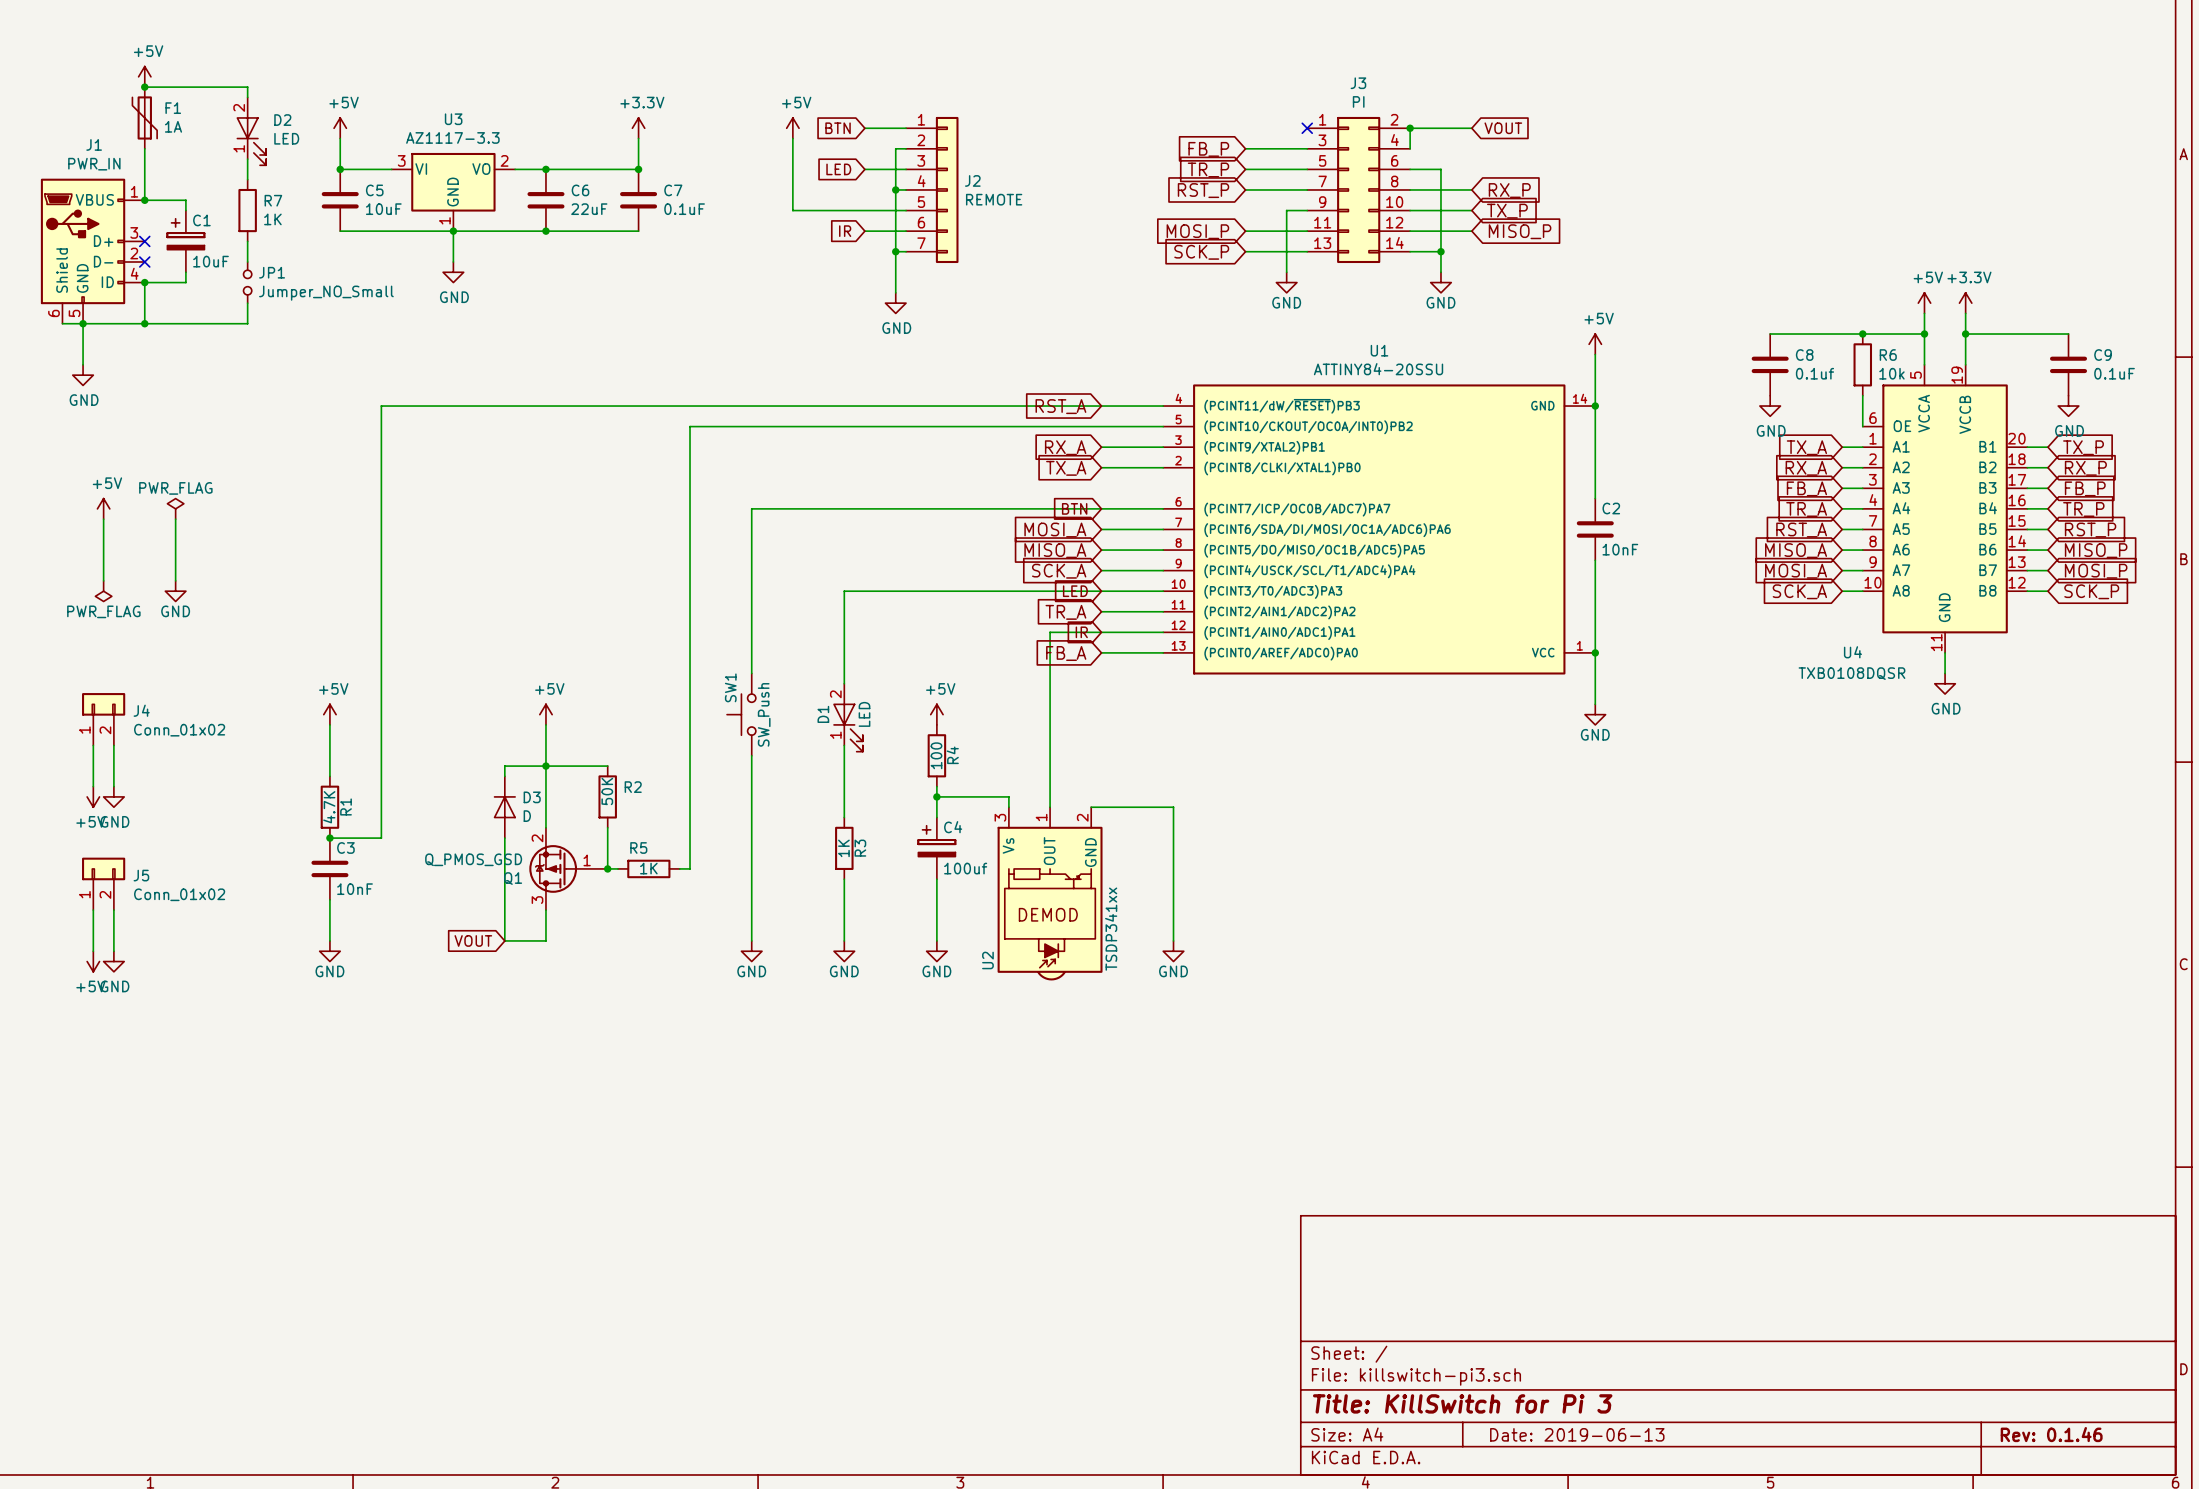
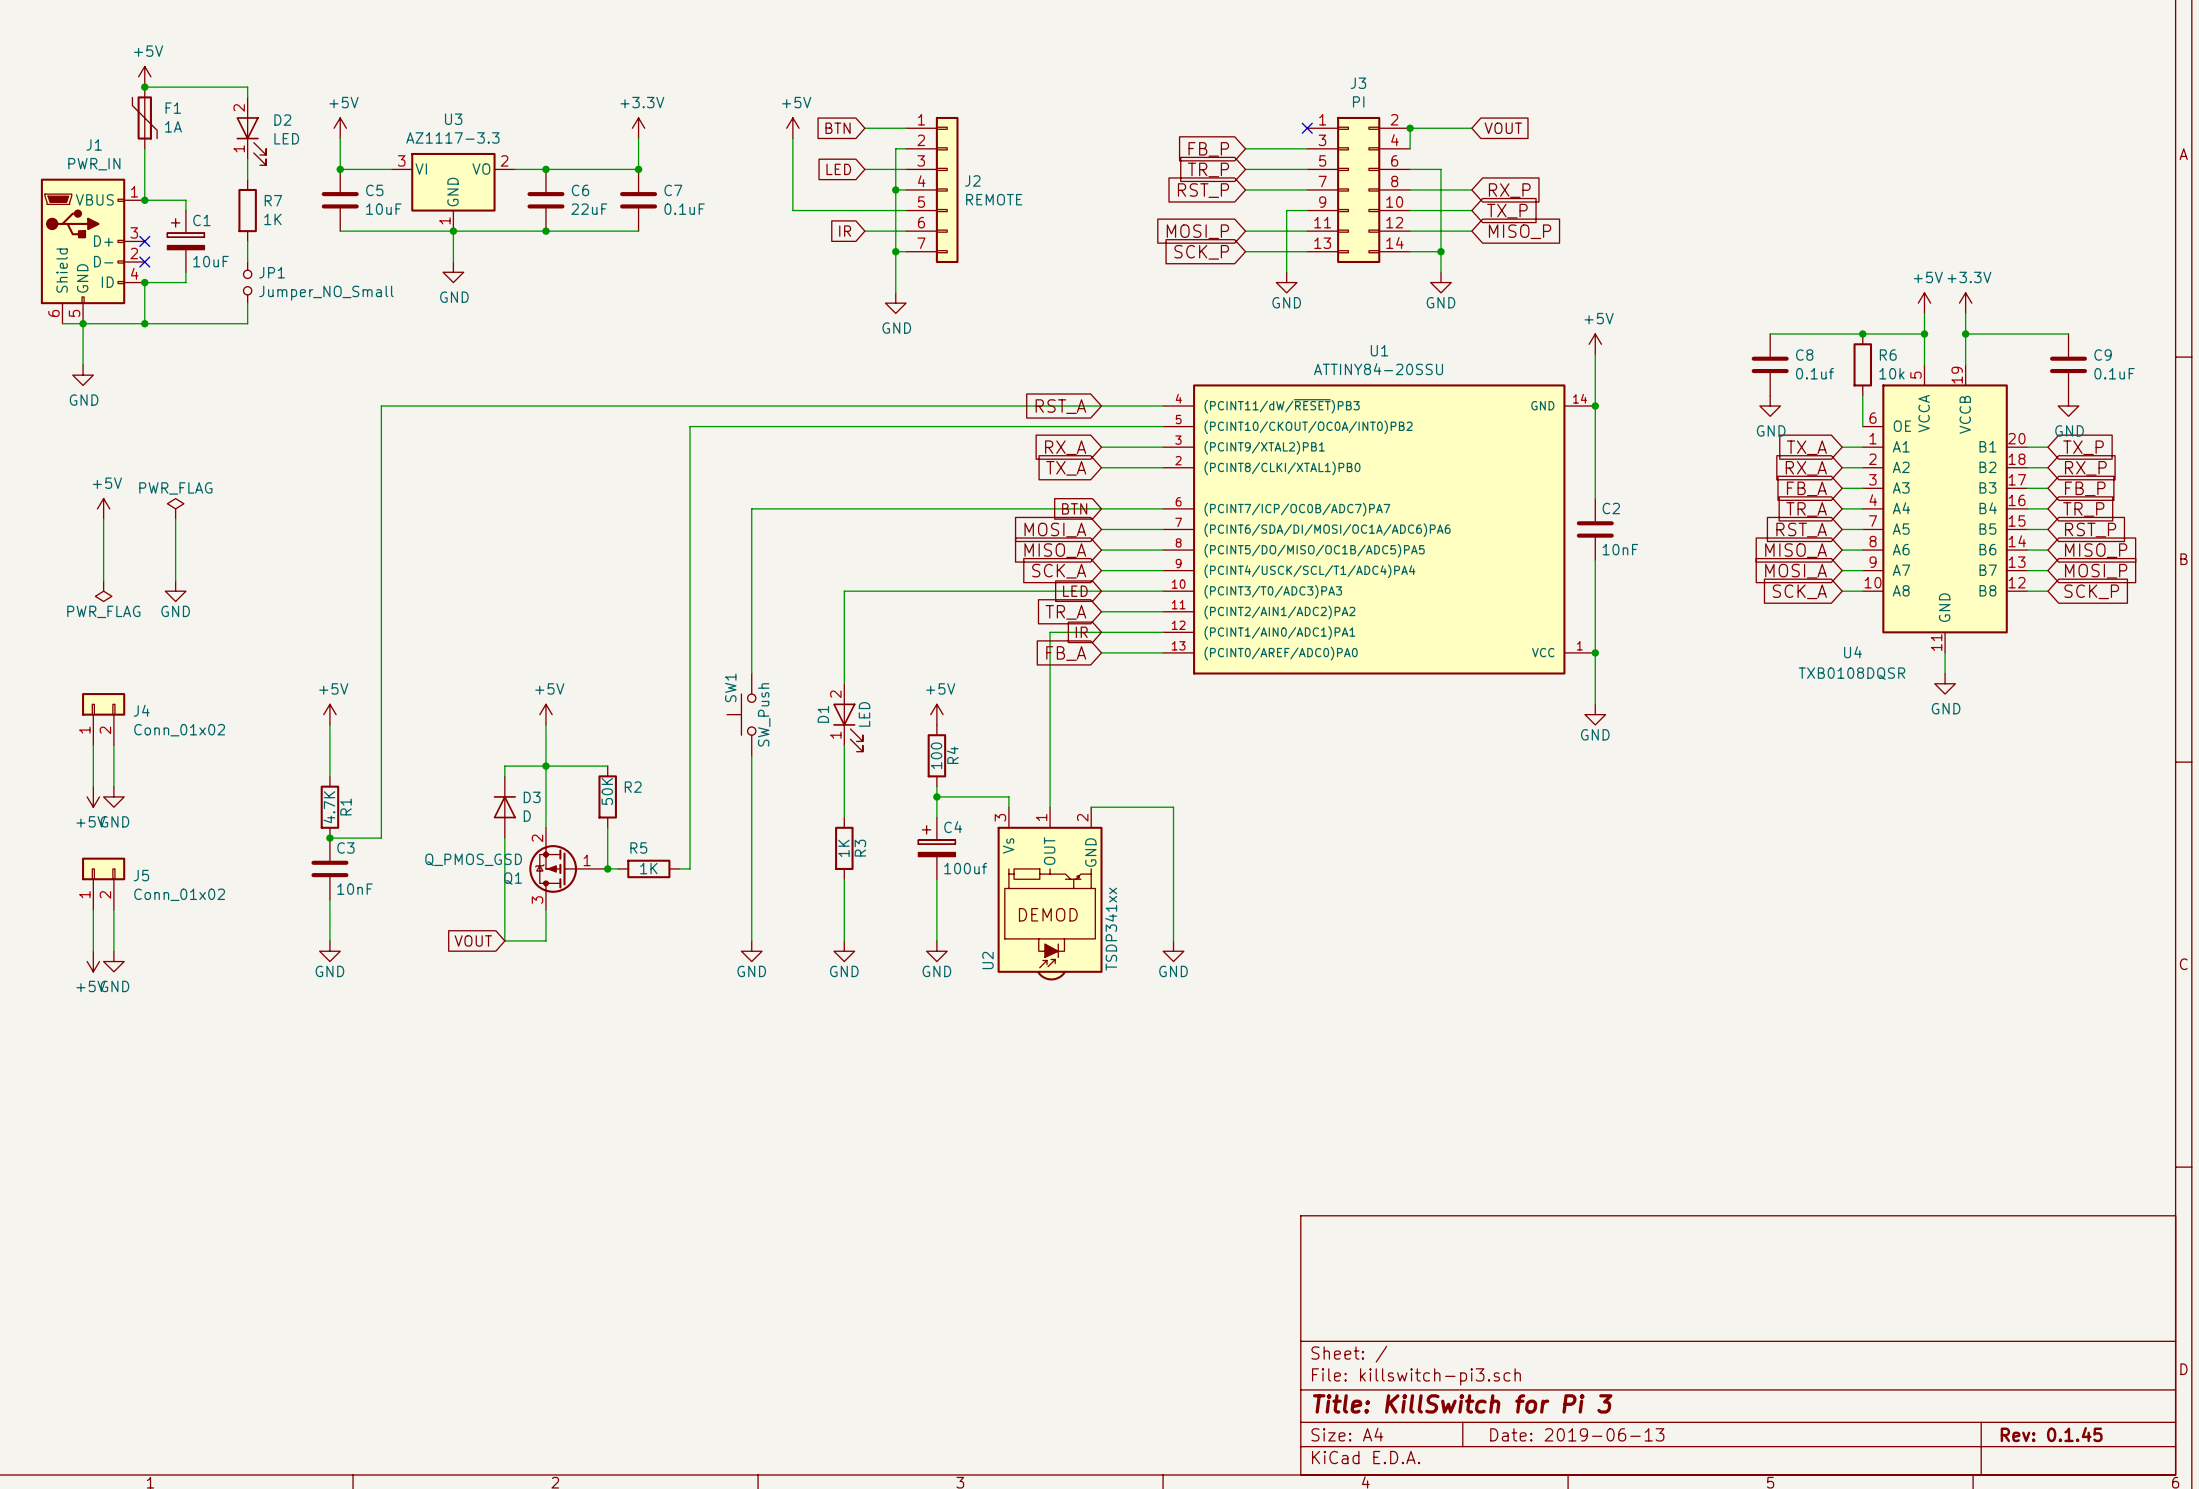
title block: Rev: 0.1.46 (2051, 1434) -> Rev: 0.1.45 (2051, 1434)

